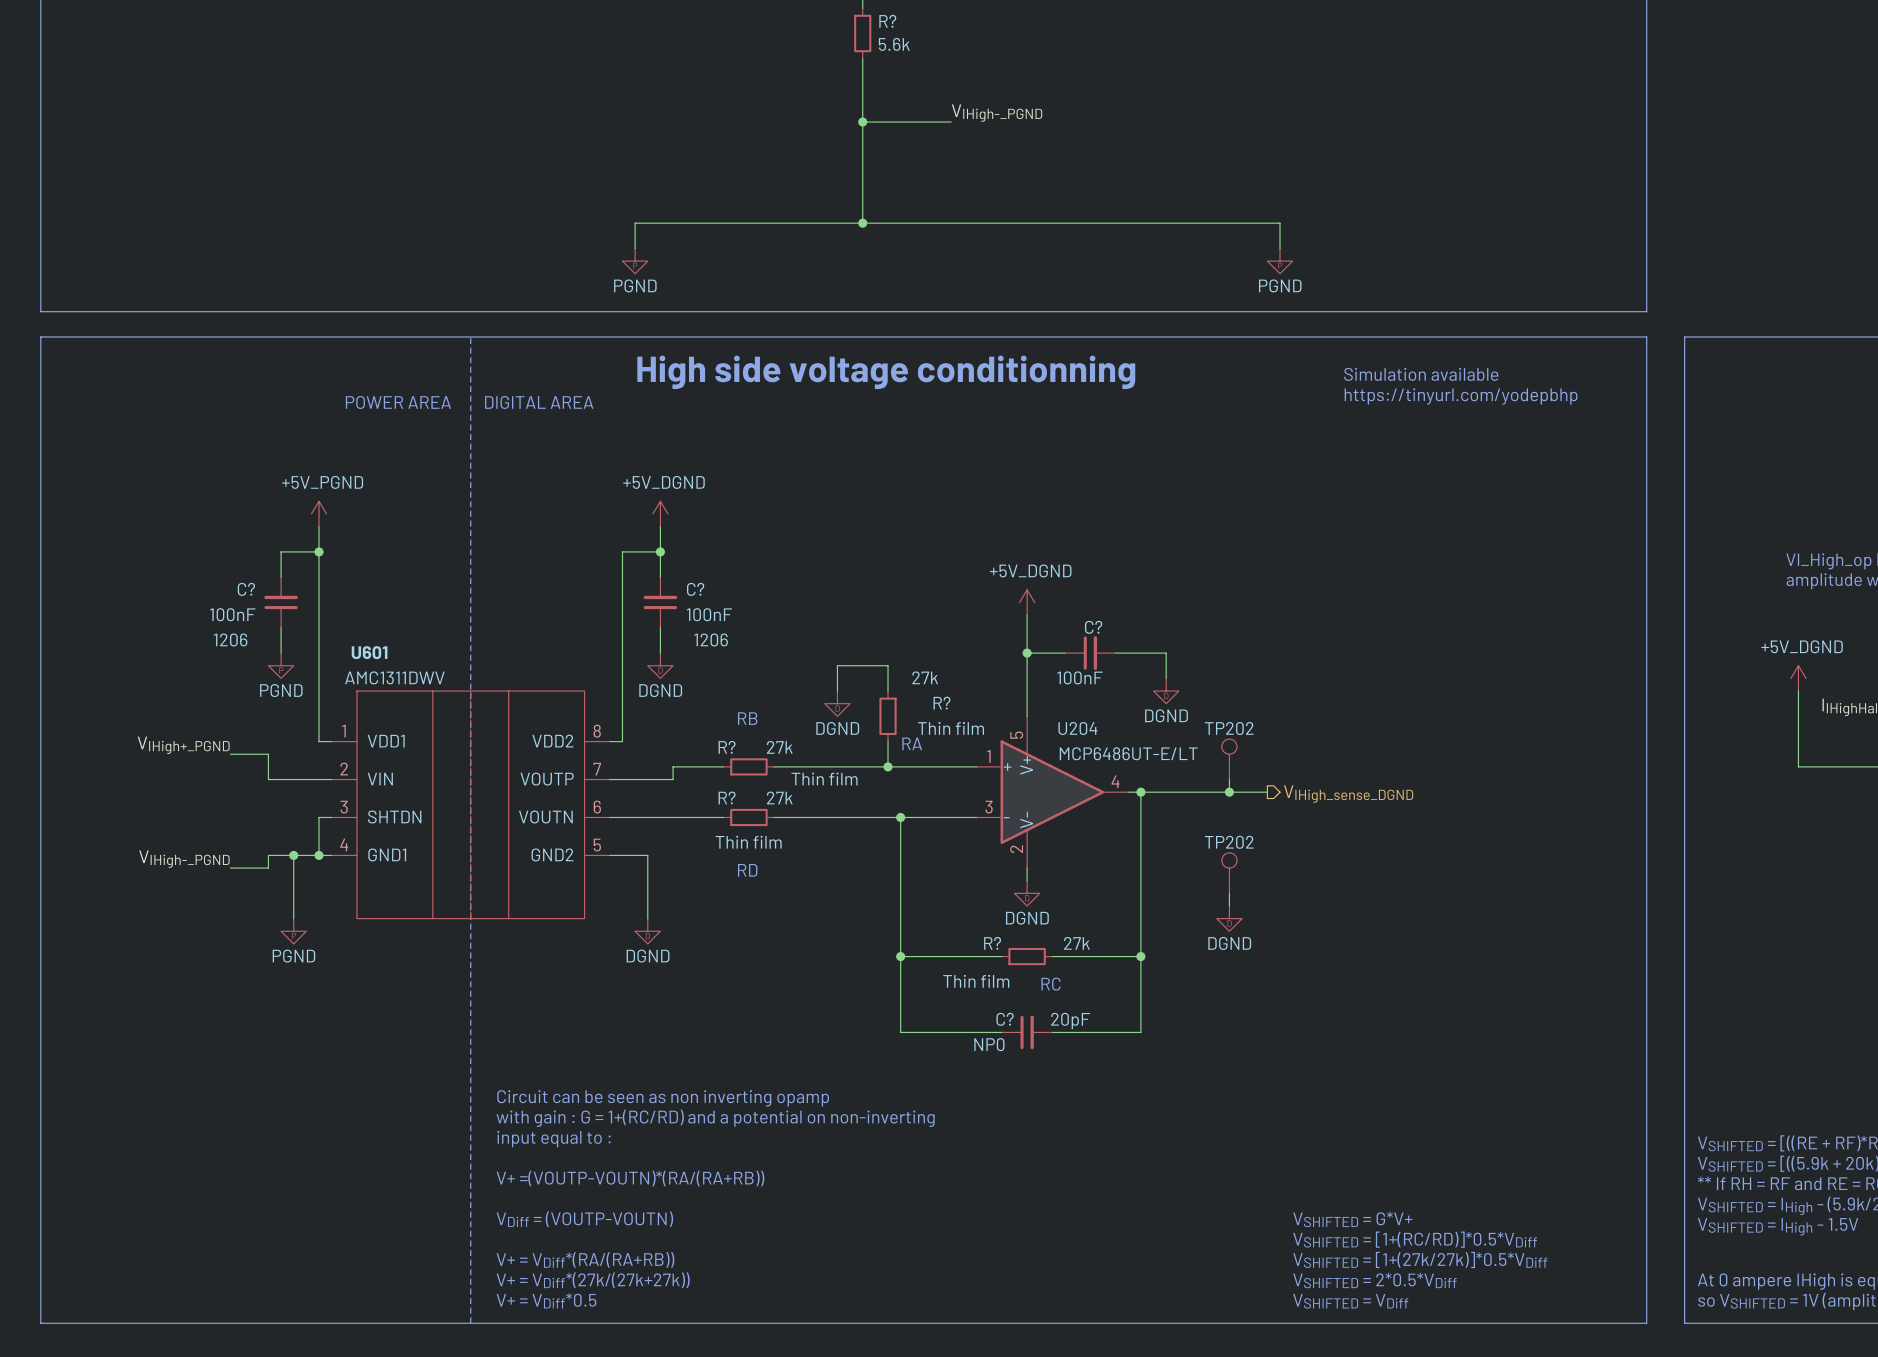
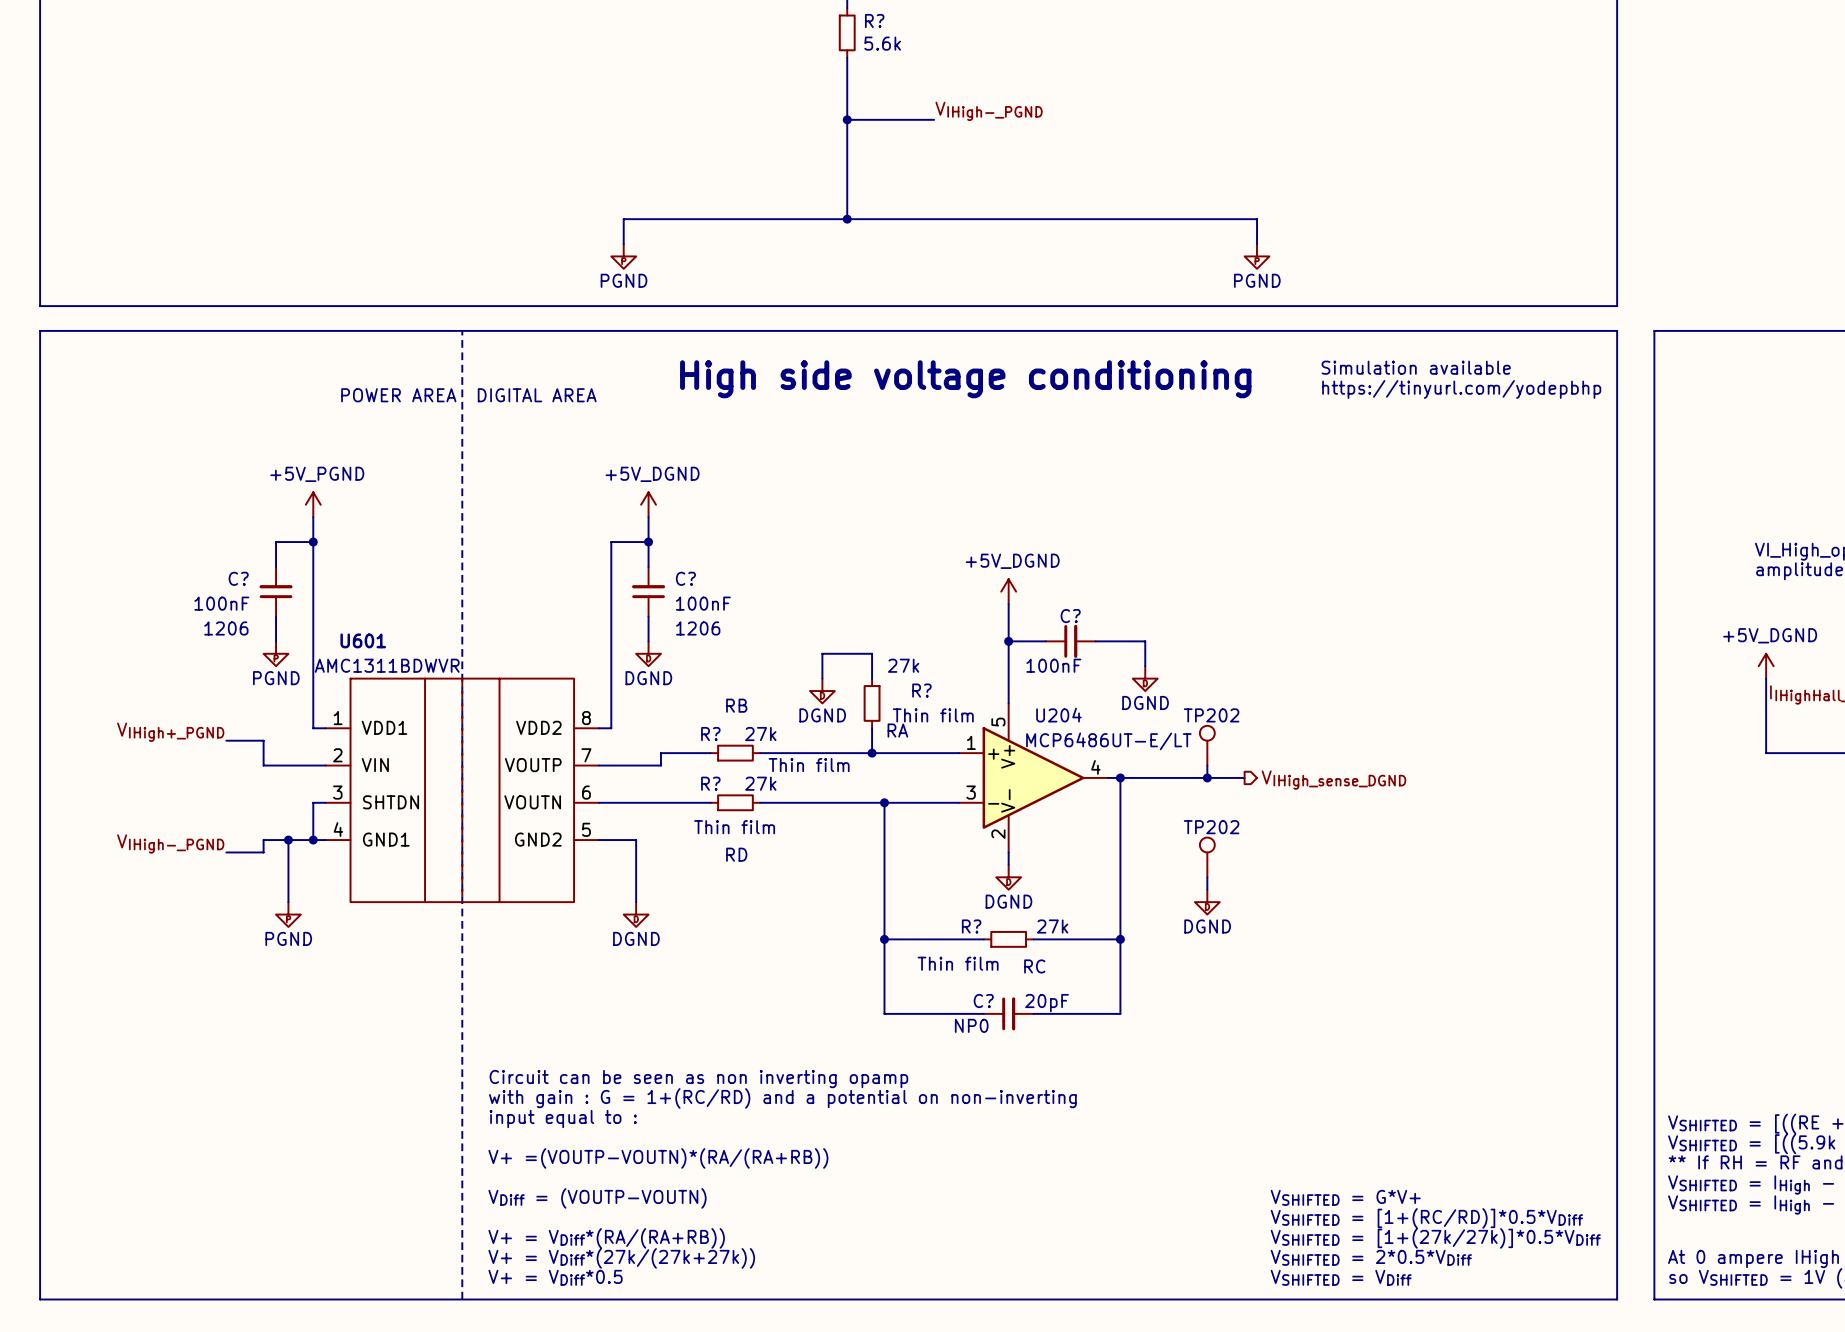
text: High side voltage conditionning (886, 372) -> High side voltage conditioning (965, 379)
U601 value: AMC1311DWV (394, 677) -> AMC1311BDWVR (387, 665)

